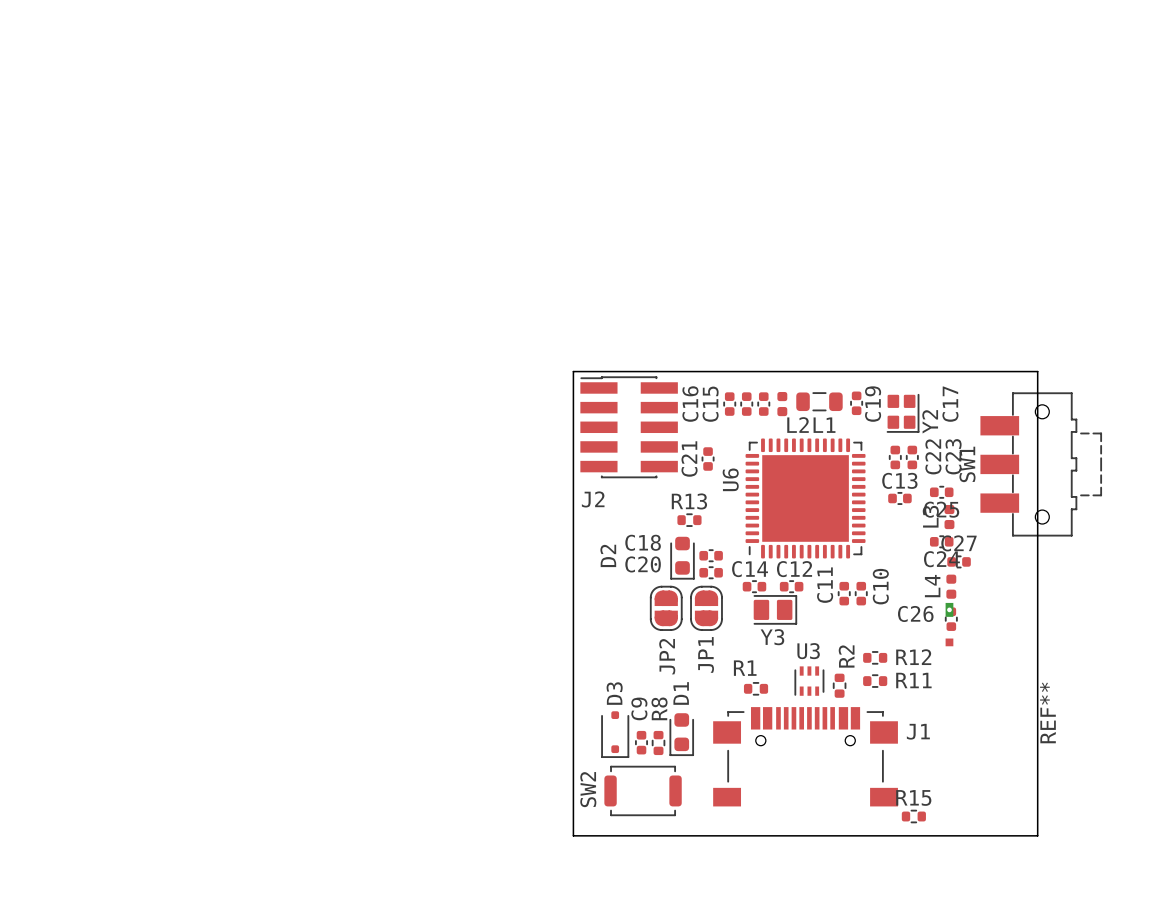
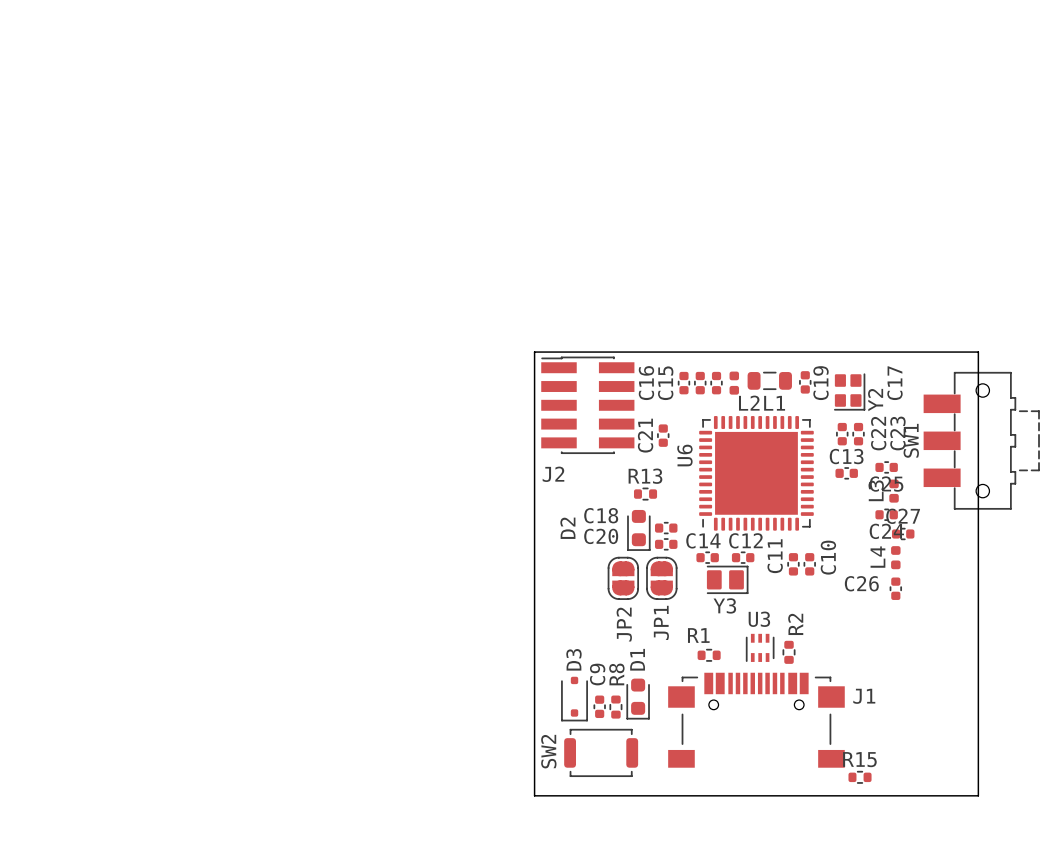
REF**: (949, 624) -> none
R12: (875, 657) -> none
R11: (875, 681) -> none

